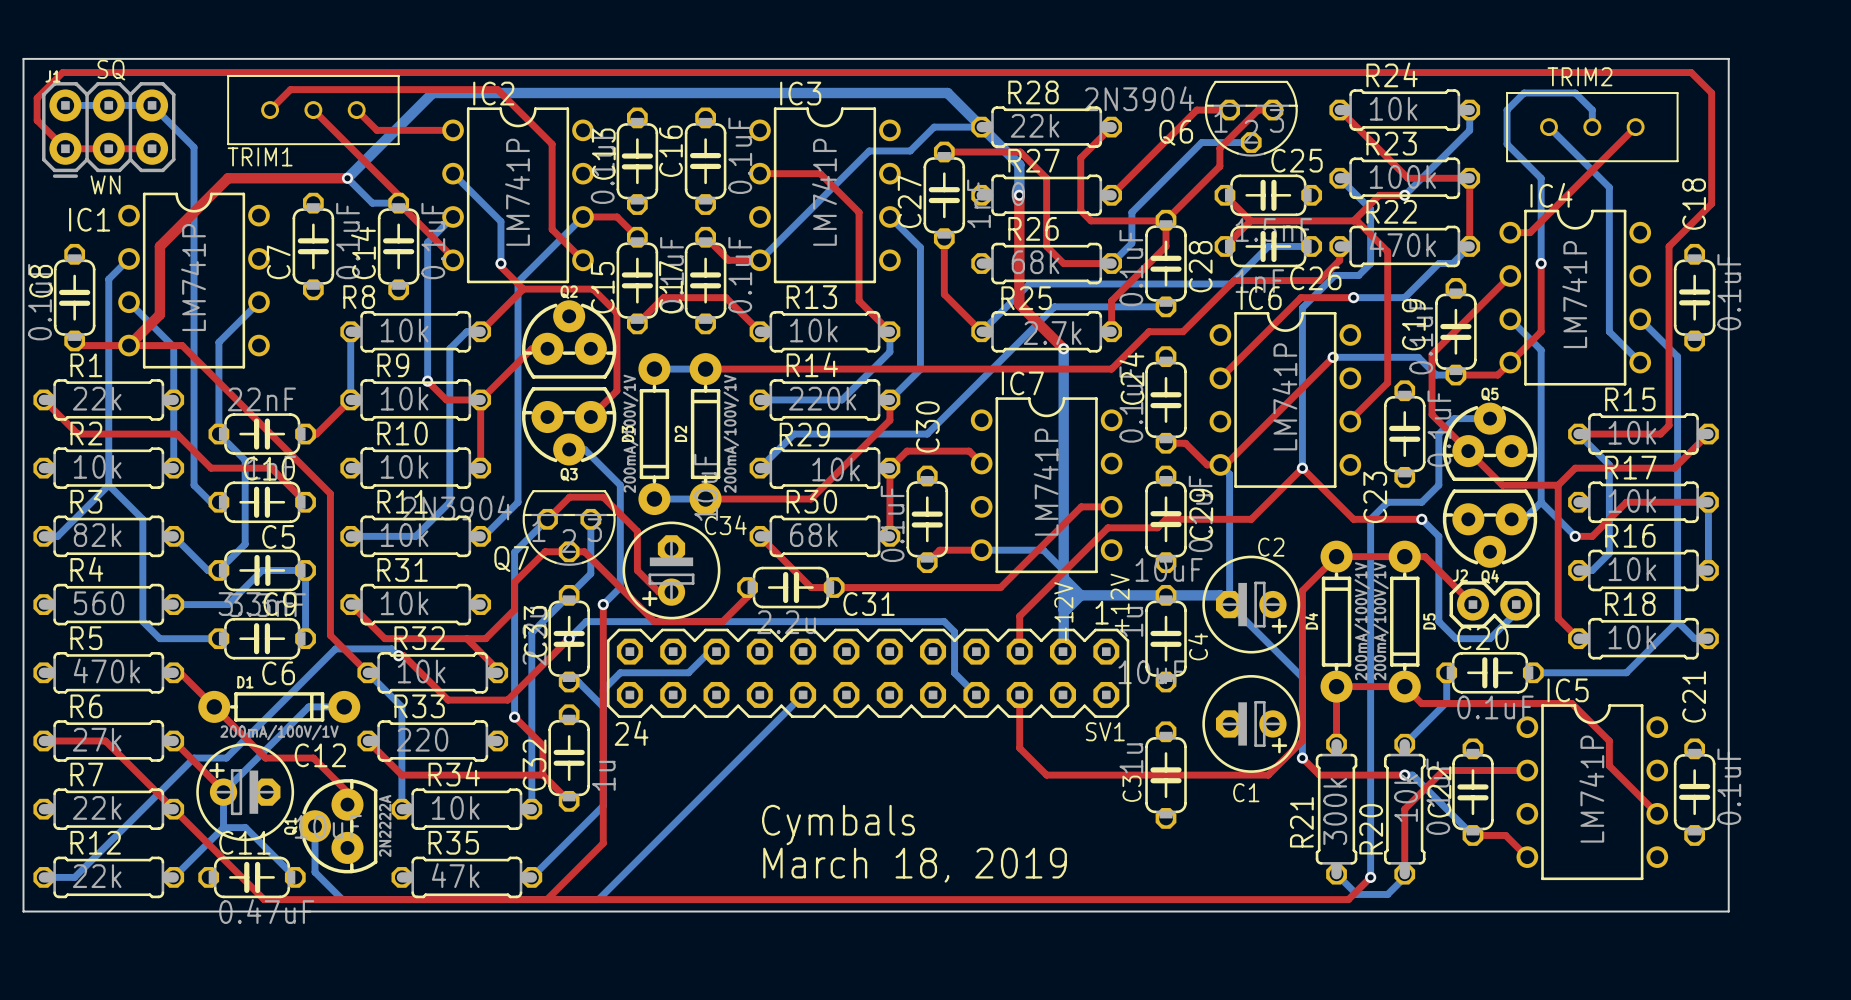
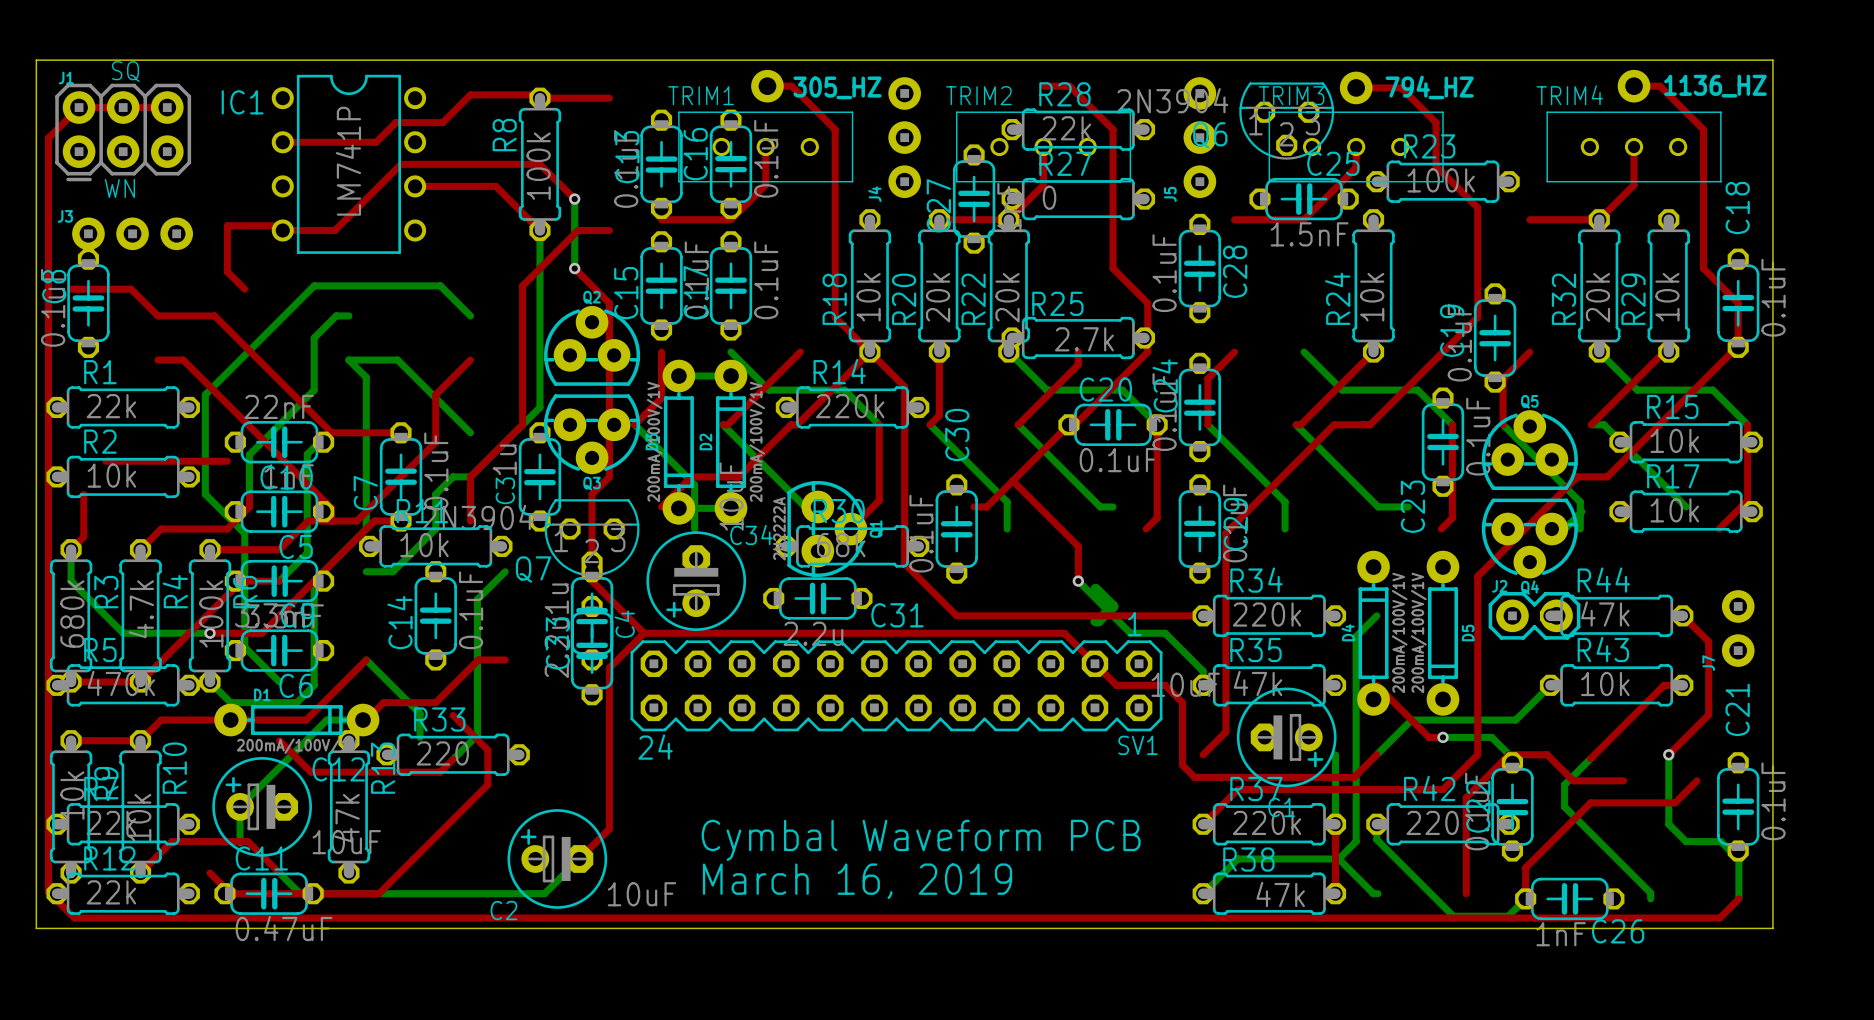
R24 name position: R24 (1392, 74) -> R24 (1337, 298)
TRIM2 name position: TRIM2 (1579, 76) -> TRIM2 (978, 95)
top track: none -> (767, 86) (791, 86) (835, 129) (835, 317) (904, 386) (904, 563) (956, 615) (1203, 615)
305_HZ: none -> (767, 86)
top track: none -> (1634, 86) (1660, 86) (1703, 129) (1703, 268) (1738, 303) (1738, 352) (1732, 352) (1607, 476) (1577, 476) (1477, 576) (1477, 754) (1443, 789)
1136_HZ: none -> (1634, 86)
top track: none -> (1356, 87) (1401, 87) (1436, 122) (1436, 166) (1477, 207) (1477, 317) (1370, 424) (1334, 424) (1225, 533) (1225, 732) (1203, 754)
794_HZ: none -> (1356, 87)
top track: none -> (609, 98) (539, 98) (536, 94) (470, 94) (442, 122) (395, 122) (376, 142) (282, 142)
bottom track: (65, 105) (152, 105) (194, 147) (194, 485) (211, 502) (218, 502) -> none
top track: none -> (167, 107) (79, 107) (48, 138) (48, 891) (74, 918) (1719, 918) (1738, 898)
top track: (270, 110) (290, 89) (497, 89) (552, 144) (552, 229) (582, 260) -> none
top track: (313, 110) (398, 195) (398, 203) (453, 257) (453, 260) -> none
TRIM1 position: (313, 110) -> (765, 146)
top track: (356, 110) (376, 130) (453, 130) -> none
top track: (1229, 110) (1196, 110) (1111, 195) -> none
top track: (1272, 110) (1258, 110) (1219, 148) (1219, 166) (1165, 220) -> none
top track: (1339, 110) (1407, 178) (1469, 178) (1469, 246) -> none
R24 rotation: 0° (1404, 110) -> 90° clockwise (1373, 285)
R24 position: (1404, 110) -> (1373, 285)
bottom track: (1469, 110) (1469, 130) (1404, 195) -> none
bottom track: (981, 127) (934, 127) (910, 150) (869, 150) (759, 260) -> none
top track: (1111, 127) (1080, 157) -> (1043, 86) (1069, 86) (1113, 129) (1113, 161)
bottom track: (1549, 127) (1609, 187) (1609, 331) (1640, 362) -> none
bottom track: (1592, 127) (1592, 110) (1575, 93) (1524, 93) (1507, 110) (1507, 144) (1541, 178) (1541, 263) -> none
TRIM2 position: (1592, 127) -> (1043, 146)
top track: (1635, 127) (1530, 232) (1510, 232) -> none
J4: none -> (904, 137)
J5: none -> (1199, 137)
bottom track: (1251, 142) (1201, 142) (1131, 212) (1131, 243) (1111, 263) -> none
top track: none -> (765, 146) (765, 185) (730, 219) (661, 219)
top track: none -> (1043, 146) (1043, 185) (1008, 219) (939, 219)
top track: none -> (1356, 146) (1356, 167) (1304, 219) (1234, 219)
TRIM3: none -> (1356, 146)
top track: none -> (1634, 146) (1634, 185) (1599, 219) (1529, 219)
TRIM4: none -> (1634, 146)
top track: (152, 148) (65, 148) (37, 120) (37, 98) (62, 72) (1691, 72) (1711, 93) (1711, 203) (1669, 246) (1669, 425) (1660, 434) (1578, 434) -> none
top track: (944, 152) (1020, 152) (1046, 178) (1046, 246) (1063, 263) (1111, 263) -> none
TRIM1 name position: TRIM1 (260, 156) -> TRIM1 (701, 95)
bottom track: (453, 173) (500, 221) (500, 263) -> none
top track: (759, 173) (820, 173) (859, 212) (859, 300) (889, 331) -> none
top track: (347, 178) (228, 178) (159, 246) (159, 314) (129, 345) -> none
via: (347, 178) -> none
bottom track: (1339, 178) (1370, 209) (1370, 263) (1358, 275) (1334, 275) (1302, 307) (1302, 468) -> none
top track: none -> (415, 186) (495, 186) (539, 230)
IC2: LM741P (518, 195) -> none
top track: none -> (574, 199) (539, 164) (401, 164) (334, 230) (282, 230) (278, 225) (227, 225) (227, 271) (244, 289)
via: none -> (574, 199)
IC3: LM741P (824, 195) -> none
top track: (1019, 195) (1019, 304) (1063, 348) -> none
bottom track: (1019, 195) (1019, 164) (947, 93) (432, 93) (347, 178) (372, 203) (398, 203) -> none
via: (1019, 195) -> none
top track: (1225, 195) (1250, 220) -> none
top track: (1404, 195) (1379, 195) (1353, 220) -> none
via: (1404, 195) -> none
top track: (1080, 210) (1090, 220) (1165, 220) -> (1113, 214) (1113, 268) (1147, 303) (1147, 352) (1075, 424) (1068, 424) (986, 506) (974, 506)
R22 name position: R22 (1391, 211) -> R22 (973, 299)
bottom track: (453, 216) (427, 242) (427, 381) -> none
top track: (582, 216) (617, 216) (637, 237) -> none
bottom track: (582, 216) (518, 281) -> (539, 230) (539, 287)
bottom track: (889, 216) (920, 247) (920, 369) (889, 399) -> none
top track: (1165, 220) (1166, 246) (1111, 300) (1111, 331) -> none
top track: (1250, 220) (1356, 220) (1387, 251) (1387, 382) (1350, 421) -> none
top track: (1250, 220) (1225, 246) -> none
top track: none -> (609, 230) (578, 230) (522, 285) (522, 424) (470, 476) (470, 521)
J3: none -> (132, 233)
top track: (705, 237) (728, 260) (759, 260) -> none
top track: (944, 238) (944, 294) (981, 331) -> none
R22 value: 470k (1402, 244) -> 20k (1007, 297)
C7 position: (313, 246) -> (401, 476)
C14 position: (398, 246) -> (435, 615)
C26 position: (1268, 246) -> (1569, 898)
bottom track: (1311, 246) (1268, 246) (1230, 283) (1029, 283) (981, 331) -> none
top track: (1339, 246) (1339, 260) (1319, 280) (1234, 280) (1183, 331) (1148, 331) (1111, 369) (705, 369) -> none
R22 rotation: 0° (1404, 246) -> 90° clockwise (1008, 285)
R22 position: (1404, 246) -> (1008, 285)
bottom track: (1469, 246) (1452, 263) (1438, 263) (1404, 297) (1353, 297) -> none
bottom track: (129, 258) (108, 279) (108, 485) -> none
top track: (500, 263) (500, 266) (523, 289) -> none
via: (500, 263) -> none
top track: none -> (574, 268) (609, 303) (609, 476) (592, 494) (592, 581) (644, 633)
via: none -> (574, 268)
R26: 68k (1046, 263) -> none
top track: (1541, 263) (1541, 331) (1497, 375) (1455, 375) -> none
via: (1541, 263) -> none
top track: (1510, 275) (1432, 354) (1432, 414) (1502, 485) (1558, 485) -> none
IC1 position: (194, 280) -> (348, 164)
top track: none -> (71, 289) (131, 289) (157, 315) (214, 315) (331, 432) (401, 432)
top track: (523, 289) (480, 331) -> none
top track: (523, 289) (593, 289) (616, 312) (616, 390) (590, 417) -> none
top track: (1353, 297) (1301, 297) (1220, 378) -> none
via: (1353, 297) -> none
IC4: LM741P (1575, 297) -> none
bottom track: (129, 302) (173, 346) (173, 468) -> none
bottom track: (258, 302) (218, 342) (218, 434) (245, 460) (245, 544) (218, 570) (207, 570) (173, 536) -> none
bottom track: (1166, 306) (1054, 306) (927, 434) (794, 434) (759, 468) -> none
bottom track: none -> (348, 315) (336, 315) (314, 337) (314, 390) (249, 454) (249, 494)
bottom track: none -> (470, 315) (440, 285) (314, 285) (205, 394) (205, 494) (244, 533) (244, 647) (279, 682)
bottom track: (1510, 319) (1541, 350) (1541, 502) (1575, 536) -> none
bottom track: (1640, 319) (1677, 356) (1677, 621) -> none
top track: (637, 323) (663, 297) (725, 297) (759, 331) -> none
R8 value: 10k (404, 330) -> 100k (538, 166)
R13 value: 10k (813, 330) -> 47k (347, 818)
bottom track: (350, 331) (350, 399) -> (574, 199) (574, 268)
R8 rotation: 0° (415, 331) -> 90° clockwise (539, 164)
R8 position: (415, 331) -> (539, 164)
bottom track: (480, 331) (466, 331) (449, 348) (449, 502) (415, 536) (350, 536) -> none
R13 rotation: 0° (824, 331) -> 90° clockwise (348, 806)
R13 position: (824, 331) -> (348, 806)
bottom track: (889, 331) (889, 352) (842, 399) (759, 399) -> none
top track: (74, 340) (79, 345) (182, 345) (330, 493) (330, 635) (367, 672) -> none
top track: none -> (661, 352) (661, 398) (634, 424)
bottom track: none -> (730, 352) (769, 390) (844, 390) (879, 424)
top track: none -> (800, 352) (727, 424) (723, 424)
top track: none -> (869, 352) (797, 424) (791, 424) (738, 476) (691, 476) (661, 506)
top track: none -> (939, 352) (939, 415) (930, 424)
bottom track: none -> (1008, 352) (1046, 390) (1122, 390) (1157, 424)
top track: none -> (1078, 352) (1078, 364) (1018, 424)
top track: none -> (1234, 352) (1207, 378) (1207, 424)
bottom track: none -> (1304, 352) (1342, 390) (1417, 390) (1452, 424)
top track: none -> (1373, 352) (1300, 424) (1296, 424)
top track: none -> (1529, 352) (1503, 378) (1503, 424)
bottom track: none -> (1599, 352) (1637, 390) (1712, 390) (1747, 424)
top track: none -> (1668, 352) (1664, 352) (1591, 424)
top track: (547, 348) (531, 348) (480, 399) -> none
bottom track: (1063, 348) (1063, 651) -> none
via: (1063, 348) -> none
top track: none -> (157, 360) (183, 360) (331, 508) (331, 521)
top track: none -> (470, 360) (435, 394) (435, 442) (356, 521) (308, 521) (279, 549) (210, 549)
top track: (1333, 357) (1225, 464) (1207, 464) (1185, 443) (1166, 443) -> none
bottom track: (1333, 357) (1418, 357) (1436, 375) (1455, 375) -> none
via: (1333, 357) -> none
top track: (427, 381) (446, 399) (480, 399) -> none
via: (427, 381) -> none
top track: (43, 399) (77, 434) (176, 434) (211, 468) (271, 468) (305, 502) -> none
top track: (350, 399) (316, 434) (305, 434) -> none
R9 rotation: 0° (415, 399) -> 90° clockwise (71, 806)
R9 position: (415, 399) -> (71, 806)
top track: (480, 399) (480, 468) -> none
bottom track: (518, 399) (518, 502) (483, 536) (480, 536) -> (539, 407) (470, 476) (453, 476) (435, 494) (435, 529) (393, 571) (366, 571)
top track: (889, 399) (889, 420) (811, 499) (705, 499) -> none
IC6: LM741P (1285, 399) -> none
bottom track: none -> (634, 424) (694, 484) (694, 529)
bottom track: none -> (723, 424) (805, 506) (817, 506)
top track: none -> (879, 424) (879, 500) (850, 529)
bottom track: none -> (930, 424) (1007, 502) (1007, 529)
bottom track: none -> (1018, 424) (1100, 506) (1113, 506)
top track: none -> (1157, 424) (1157, 517) (1146, 529)
bottom track: none -> (1207, 424) (1285, 502) (1285, 529)
bottom track: none -> (1296, 424) (1378, 506) (1408, 506)
top track: none -> (1452, 424) (1452, 517) (1441, 529)
bottom track: none -> (1503, 424) (1580, 502) (1580, 529)
bottom track: none -> (1591, 424) (1603, 424) (1686, 506)
top track: none -> (1747, 424) (1747, 500) (1719, 529)
bottom track: (1490, 418) (1454, 418) (1438, 434) (1438, 485) (1421, 502) (1387, 502) (1370, 519) (1370, 877) -> none
bottom track: none -> (331, 432) (328, 432) (307, 454) (307, 553) (279, 581)
bottom track: none -> (470, 432) (397, 360) (348, 360) (366, 377) (366, 529) (314, 581) (314, 685) (296, 702) (230, 702) (210, 682)
R29 name position: R29 (804, 434) -> R29 (1633, 299)
bottom track: (1578, 434) (1609, 464) (1609, 553) (1592, 570) (1578, 570) -> none
top track: (1708, 434) (1674, 468) (1575, 468) (1558, 485) -> none
bottom track: (569, 449) (584, 449) (620, 485) (620, 587) (603, 604) -> none
top track: none -> (105, 461) (227, 461)
top track: (981, 463) (969, 451) (906, 451) (889, 468) (889, 536) -> none
bottom track: (1220, 464) (1229, 474) (1229, 604) -> none
R10 rotation: 0° (415, 468) -> 90° clockwise (140, 806)
R10 position: (415, 468) -> (140, 806)
R29 rotation: 0° (824, 468) -> 90° clockwise (1668, 285)
R29 position: (824, 468) -> (1668, 285)
via: (1302, 468) -> none
top track: none -> (1012, 480) (1078, 546) (1078, 581)
top track: none -> (83, 494) (83, 537) (71, 549)
bottom track: (108, 485) (57, 536) (43, 536) -> none
bottom track: (108, 485) (142, 519) (142, 621) (159, 638) (218, 638) -> none
top track: none -> (249, 494) (249, 506) (227, 529) (161, 529) (140, 549)
IC7: LM741P (1046, 485) -> none
top track: (1558, 485) (1558, 618) (1578, 638) -> none
top track: (1708, 502) (1626, 502) (1592, 536) (1575, 536) -> none
bottom track: (1708, 502) (1708, 570) -> none
top track: (1111, 506) (1081, 506) (1000, 587) (811, 587) (759, 536) -> none
top track: none -> (401, 521) (374, 521) (262, 633) (210, 633)
top track: (547, 519) (569, 497) (603, 497) (637, 531) (637, 570) (659, 592) (671, 592) -> none
bottom track: (547, 519) (514, 552) (514, 717) -> none
bottom track: (590, 519) (590, 573) (531, 632) (531, 809) -> none
top track: (1421, 519) (1353, 519) (1302, 468) (1251, 519) (1166, 519) (1157, 527) (1108, 527) (1019, 616) (1019, 651) -> none
bottom track: (1421, 519) (1438, 536) (1438, 621) (1455, 638) (1490, 638) (1516, 612) (1516, 604) -> none
via: (1421, 519) -> none
R3 value: 82k (97, 535) -> 680k (72, 613)
R3 rotation: 0° (108, 536) -> 90° clockwise (71, 615)
via: (1575, 536) -> none
bottom track: none -> (71, 549) (71, 581) (123, 633) (210, 633)
top track: (981, 550) (939, 550) (927, 562) -> none
bottom track: (981, 550) (1043, 550) (1063, 570) -> none
top track: (545, 551) (584, 551) (654, 621) -> (644, 633) (678, 633)
top track: (545, 551) (514, 582) (514, 609) (485, 638) (384, 638) (350, 604) -> none
bottom track: none -> (505, 571) (477, 599) (477, 735) (453, 759)
top track: none -> (279, 581) (241, 581) (140, 682) (71, 682)
bottom track: none -> (1078, 581) (1130, 633) (1165, 633) (1203, 671) (1203, 685)
via: none -> (1078, 581)
R16: 10k (1643, 570) -> none
top track: (747, 587) (747, 596) (722, 621) -> (1376, 754) (1354, 777) (1194, 777) (1182, 765) (1182, 702) (1165, 685) (1116, 685) (1064, 633) (748, 633)
bottom track: (1063, 594) (1220, 595) (1229, 604) -> none
R4 value: 560 (99, 603) -> 4.7k (141, 609)
text: +12V (1120, 603) -> none
R4 rotation: 0° (108, 604) -> 90° clockwise (140, 615)
bottom track: (173, 604) (228, 604) (262, 570) (305, 570) (305, 638) -> none
R31: 10k (415, 604) -> none
top track: (603, 604) (603, 843) (547, 899) -> none
via: (603, 604) -> none
bottom track: (1229, 604) (1302, 677) (1302, 758) -> none
C2 rotation: 0° (1251, 604) -> 180° (557, 858)
C2 position: (1251, 604) -> (557, 858)
bottom track: none -> (1376, 615) (1356, 636) (1356, 841) (1338, 858)
top track: (1472, 604) (1425, 556) (1336, 556) (1302, 590) (1302, 741) (1268, 775) -> none
R44: none -> 47k (1616, 615)
R18 name position: R18 (1630, 604) -> R18 (834, 299)
top track: none -> (1682, 615) (1708, 641) (1708, 714) (1668, 754)
text: -12V (1063, 611) -> none
J7: none -> (1738, 628)
via: none -> (210, 633)
top track: none -> (644, 633) (609, 667) (609, 828) (579, 858)
bottom track: (1677, 621) (1694, 638) (1708, 638) -> none
bottom track: (1677, 621) (1626, 672) (1533, 672) -> none
R32 name position: R32 (419, 638) -> R32 (1564, 299)
top track: (466, 638) (497, 669) (497, 672) -> none
top track: (569, 638) (507, 700) (448, 700) (403, 655) (398, 655) -> none
bottom track: (569, 638) (586, 621) (944, 621) (954, 631) (954, 673) (976, 694) -> none
via: (569, 638) -> none
C4 position: (1166, 638) -> (592, 615)
R18 rotation: 0° (1643, 638) -> 90° clockwise (869, 285)
R18 position: (1643, 638) -> (869, 285)
top track: none -> (366, 659) (306, 720) (161, 720) (140, 740) (71, 740)
bottom track: none -> (366, 659) (420, 713) (420, 737)
top track: none -> (505, 659) (478, 659) (435, 702) (383, 702) (348, 737) (348, 740)
bottom track: (716, 651) (709, 651) (688, 672) (620, 672) (603, 689) (603, 805) (531, 877) -> none
bottom track: (398, 655) (391, 648) (335, 648) (226, 758) (194, 758) (74, 877) (43, 877) -> none
via: (398, 655) -> none
R32 value: 10k (421, 671) -> 20k (1597, 297)
top track: (173, 672) (180, 672) (265, 758) (293, 758) -> (279, 740) (310, 772)
bottom track: (367, 672) (401, 706) (401, 809) -> none
R32 rotation: 0° (432, 672) -> 90° clockwise (1599, 285)
R32 position: (432, 672) -> (1599, 285)
top track: none -> (1376, 685) (1428, 737) (1443, 737)
bottom track: (1446, 672) (1446, 702) (1404, 744) -> none
C20 position: (1490, 672) -> (1113, 424)
bottom track: none -> (1550, 685) (1515, 720) (1411, 720) (1376, 754)
R43: none -> 10k (1616, 685)
top track: none -> (1682, 685) (1664, 685) (1590, 758)
bottom track: (569, 682) (578, 682) (603, 706) -> none
bottom track: (803, 694) (598, 899) (342, 899) (315, 872) (315, 826) -> none
top track: (1019, 694) (1019, 748) (1046, 775) (1203, 775) -> (1203, 824) (1237, 789)
top track: none -> (453, 715) (487, 750) (487, 784) (378, 893) (230, 893) (210, 873)
top track: (514, 717) (542, 745) (542, 775) -> none
via: (514, 717) -> none
bottom track: none -> (1443, 737) (1491, 737) (1509, 754)
R6 value: 27k (97, 739) -> 100k (211, 613)
top track: (43, 741) (105, 741) (264, 899) (1348, 899) (1370, 877) -> none
R6 rotation: 0° (108, 741) -> 90° clockwise (210, 615)
R6 position: (108, 741) -> (210, 615)
top track: (173, 741) (223, 792) -> none
top track: (367, 741) (401, 775) (542, 775) -> none
bottom track: none -> (1335, 754) (1335, 824)
bottom track: none -> (1668, 754) (1668, 824) (1686, 841) (1720, 841) (1738, 859) (1738, 898)
via: none -> (1668, 754)
top track: (1336, 744) (1336, 686) (1404, 686) (1421, 703) (1571, 703) (1609, 741) (1609, 765) (1657, 813) -> none
bottom track: none -> (1590, 758) (1564, 784) (1564, 806) (1650, 893) (1650, 898)
top track: (313, 758) (347, 792) (347, 804) -> (331, 772) (440, 772) (453, 759)
C32: 1u (569, 758) -> none
top track: (1302, 758) (1319, 775) -> (1304, 789) (1356, 789)
via: (1302, 758) -> none
top track: none -> (1623, 780) (1573, 780) (1547, 754) (1509, 754) (1466, 797) (1466, 893)
top track: none -> (1697, 780) (1675, 802) (1590, 802) (1525, 867) (1525, 898)
top track: (1527, 770) (1443, 770) (1404, 809) (1404, 874) -> none
top track: (542, 775) (569, 801) -> none
C3 position: (1166, 775) -> (539, 476)
bottom track: (1404, 775) (1412, 775) (1472, 835) -> none
via position: (1404, 775) -> (1443, 737)
IC5: LM741P (1592, 792) -> none
R20 value: 10k (1406, 798) -> 20k (938, 297)
R34 value: 10k (455, 807) -> 220k (1267, 614)
R34 position: (466, 809) -> (1269, 615)
R37: none -> 220k (1269, 824)
top track: none -> (1335, 824) (1335, 893)
R21: 300k (1336, 809) -> none
bottom track: none -> (1376, 824) (1376, 839) (1453, 916) (1508, 916) (1525, 898)
R20 position: (1404, 809) -> (939, 285)
R42: none -> 220 (1443, 824)
text: Cymbals (838, 825) -> none
text: none -> Cymbal Waveform PCB (921, 840)
Q1 rotation: 0° (338, 826) -> 180° (827, 529)
Q1 position: (338, 826) -> (827, 529)
R20 name position: R20 (1371, 829) -> R20 (904, 299)
top track: (1472, 835) (1505, 835) (1527, 857) -> none
bottom track: none -> (579, 858) (544, 893) (300, 893) (279, 873)
bottom track: none -> (1338, 858) (1373, 893) (1378, 893)
bottom track: none -> (1338, 858) (1237, 858) (1203, 893)
top track: none -> (140, 873) (171, 841) (248, 841) (279, 873)
text: March 18, 2019 (915, 865) -> March 16, 2019 (857, 881)
bottom track: (1336, 874) (1356, 894) (1387, 894) (1404, 877) (1404, 874) -> none
bottom track: (173, 877) (223, 827) (245, 827) (295, 877) -> none
R35 position: (466, 877) -> (1269, 685)
R38: none -> 47k (1269, 893)
via: (1370, 877) -> none

